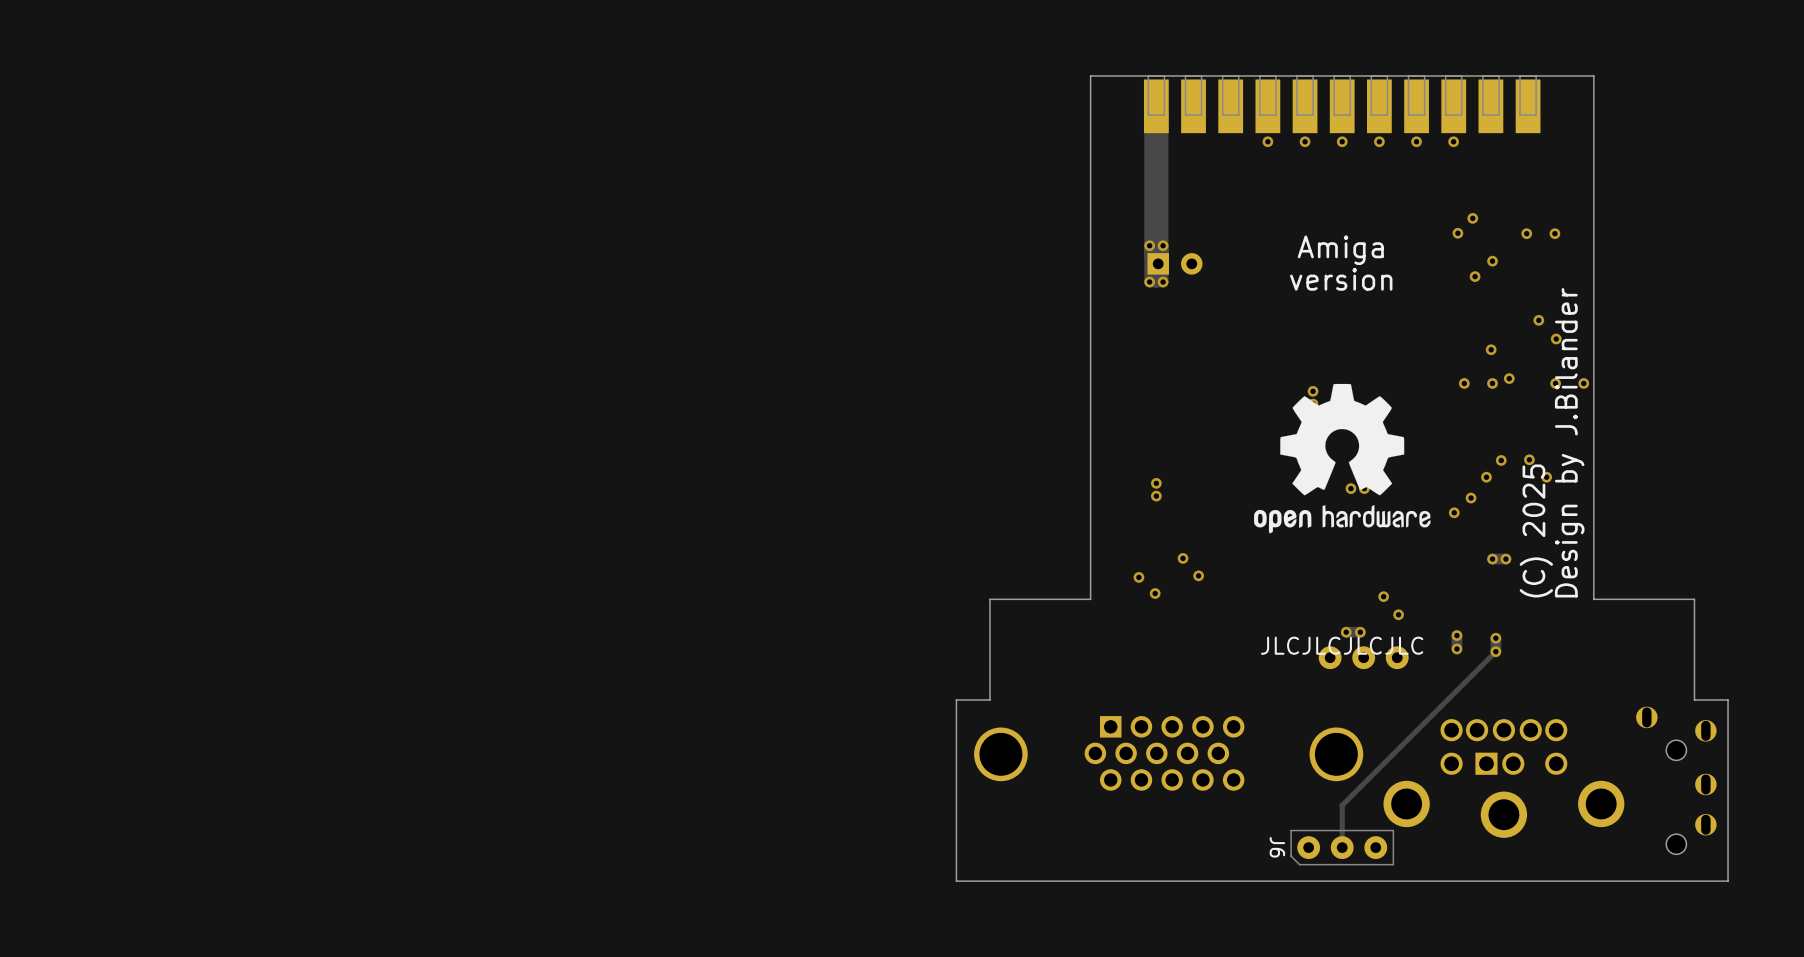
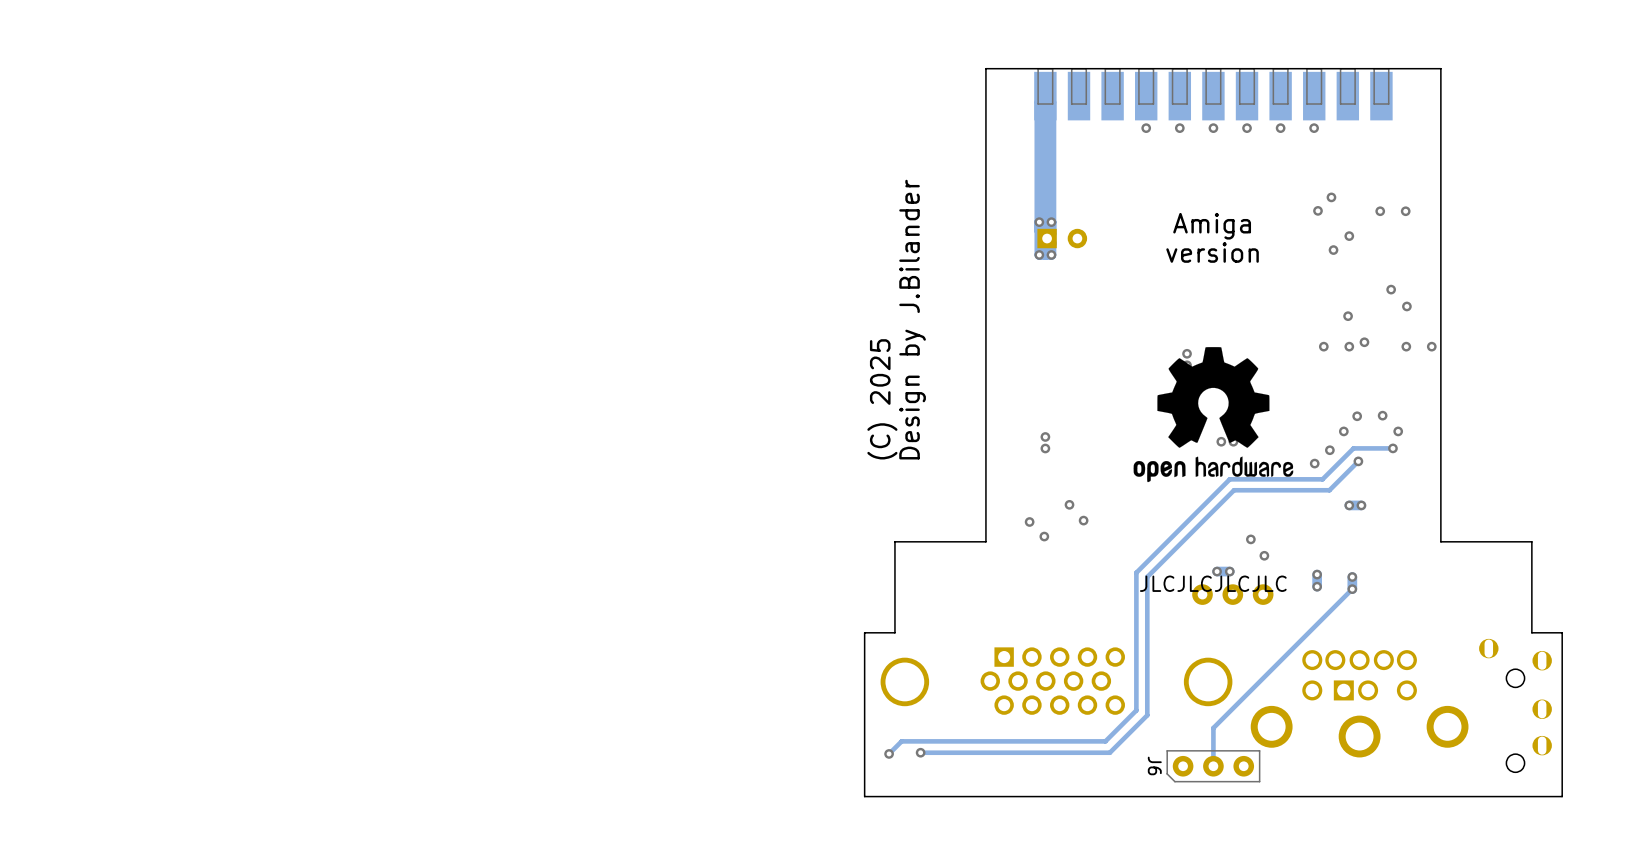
text: none -> Design by J.Bilander (912, 319)
text: none -> (C) 2025 (882, 399)
text: Design by J.Bilander (1569, 442) -> none
track: none -> (1392, 448) (1353, 448) (1322, 479) (1229, 479) (1136, 572) (1136, 710) (1105, 741) (901, 741) (889, 753)
via: none -> (1392, 448)
track: none -> (1358, 461) (1329, 490) (1234, 490) (1147, 577) (1147, 715) (1109, 752) (920, 752)
via: none -> (1358, 461)
text: (C) 2025 (1536, 530) -> none
via: none -> (920, 752)
via: none -> (889, 753)

